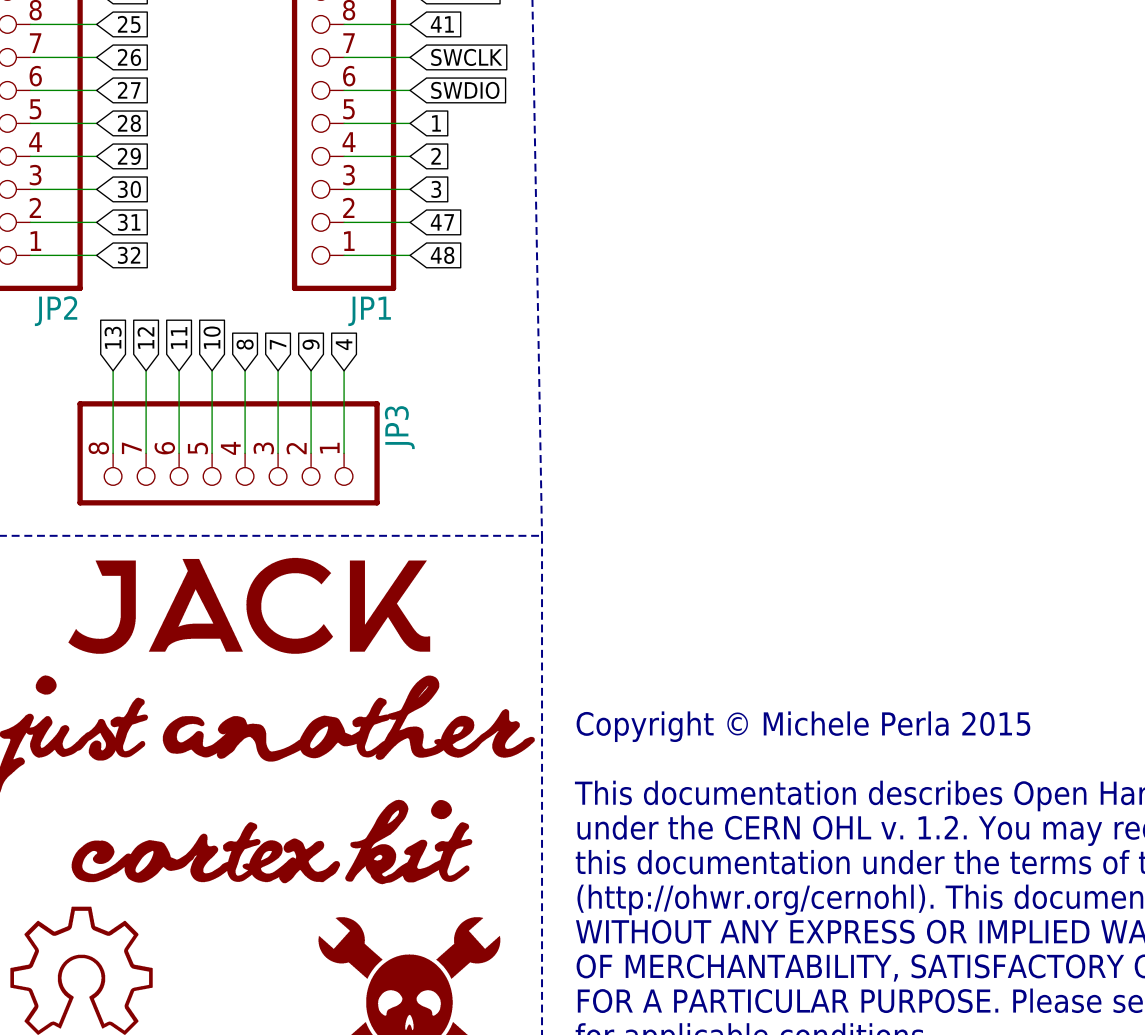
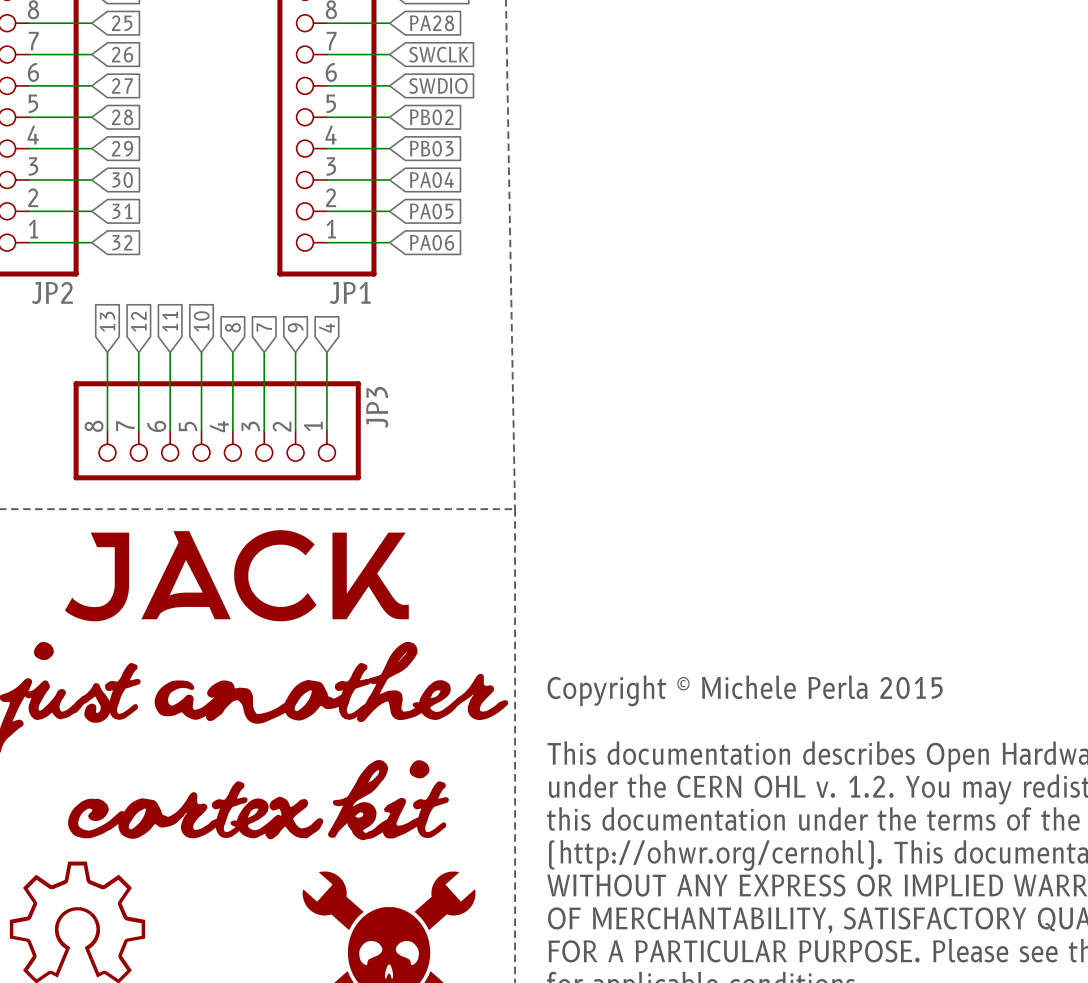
global label: 41 (442, 24) -> PA28 (432, 23)
global label: 1 (436, 123) -> PB02 (431, 117)
global label: 2 (436, 156) -> PB03 (431, 148)
global label: 3 (436, 189) -> PA04 (431, 180)
global label: 47 (442, 222) -> PA05 (431, 211)
global label: 48 (442, 255) -> PA06 (432, 242)

